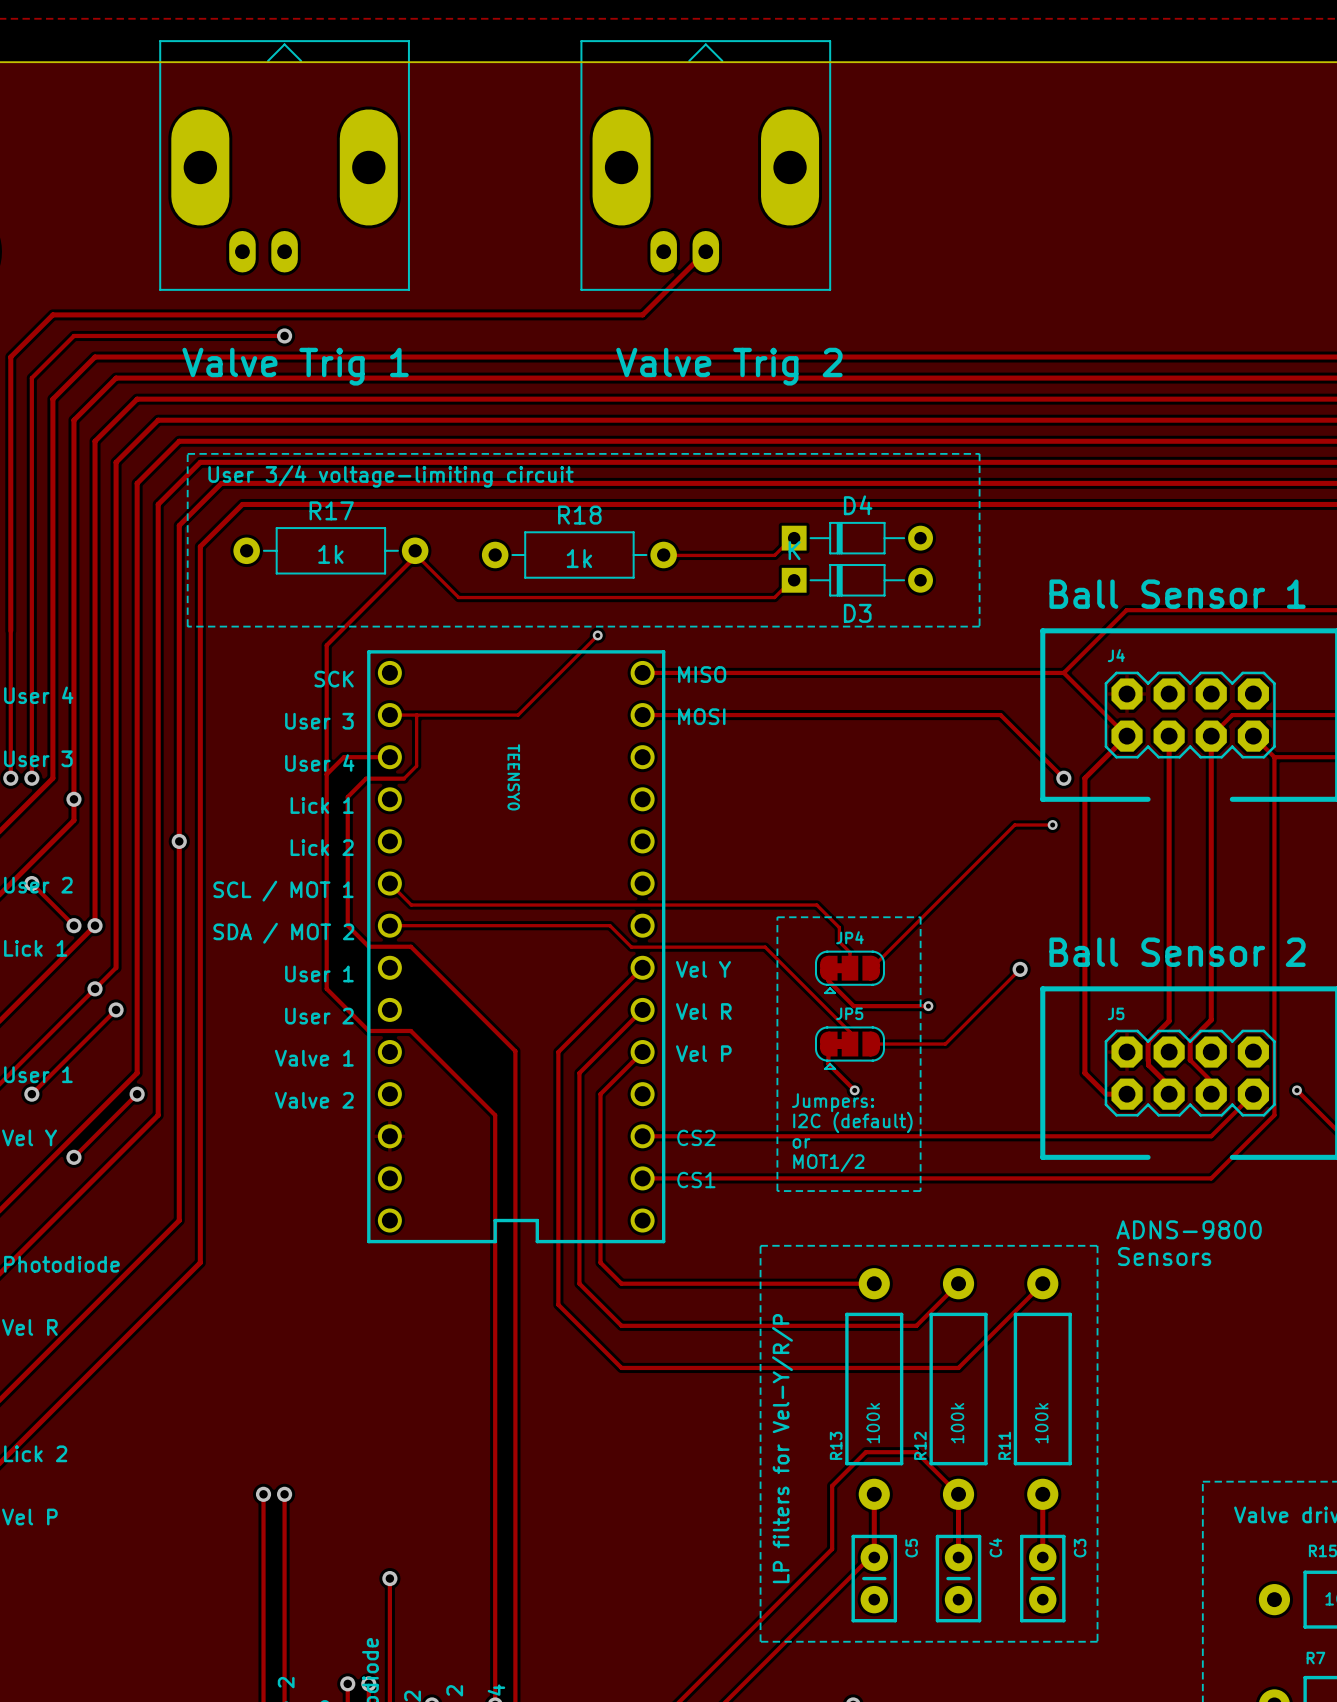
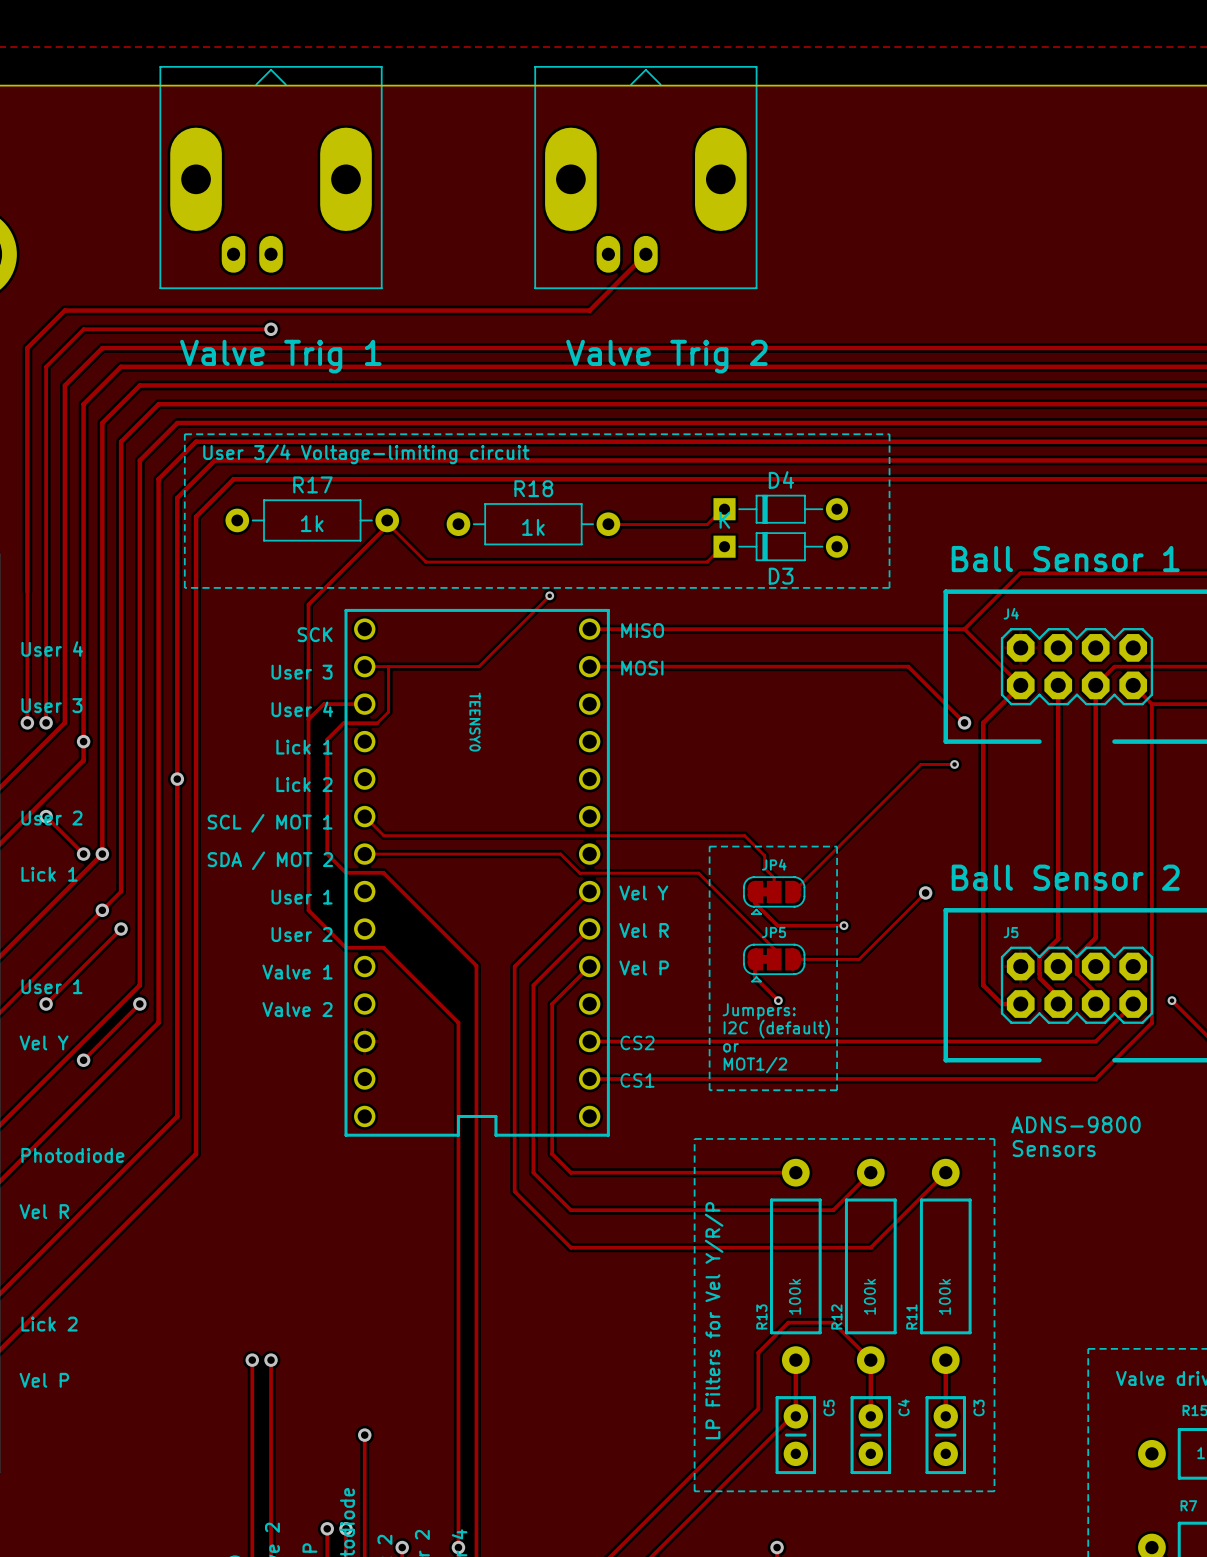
text: User 3/4 voltage-limiting circuit (391, 476) -> User 3/4 Voltage-limiting circuit (366, 454)
text: LP filters for Vel-Y/R/P (782, 1448) -> LP Filters for Vel Y/R/P (714, 1320)

